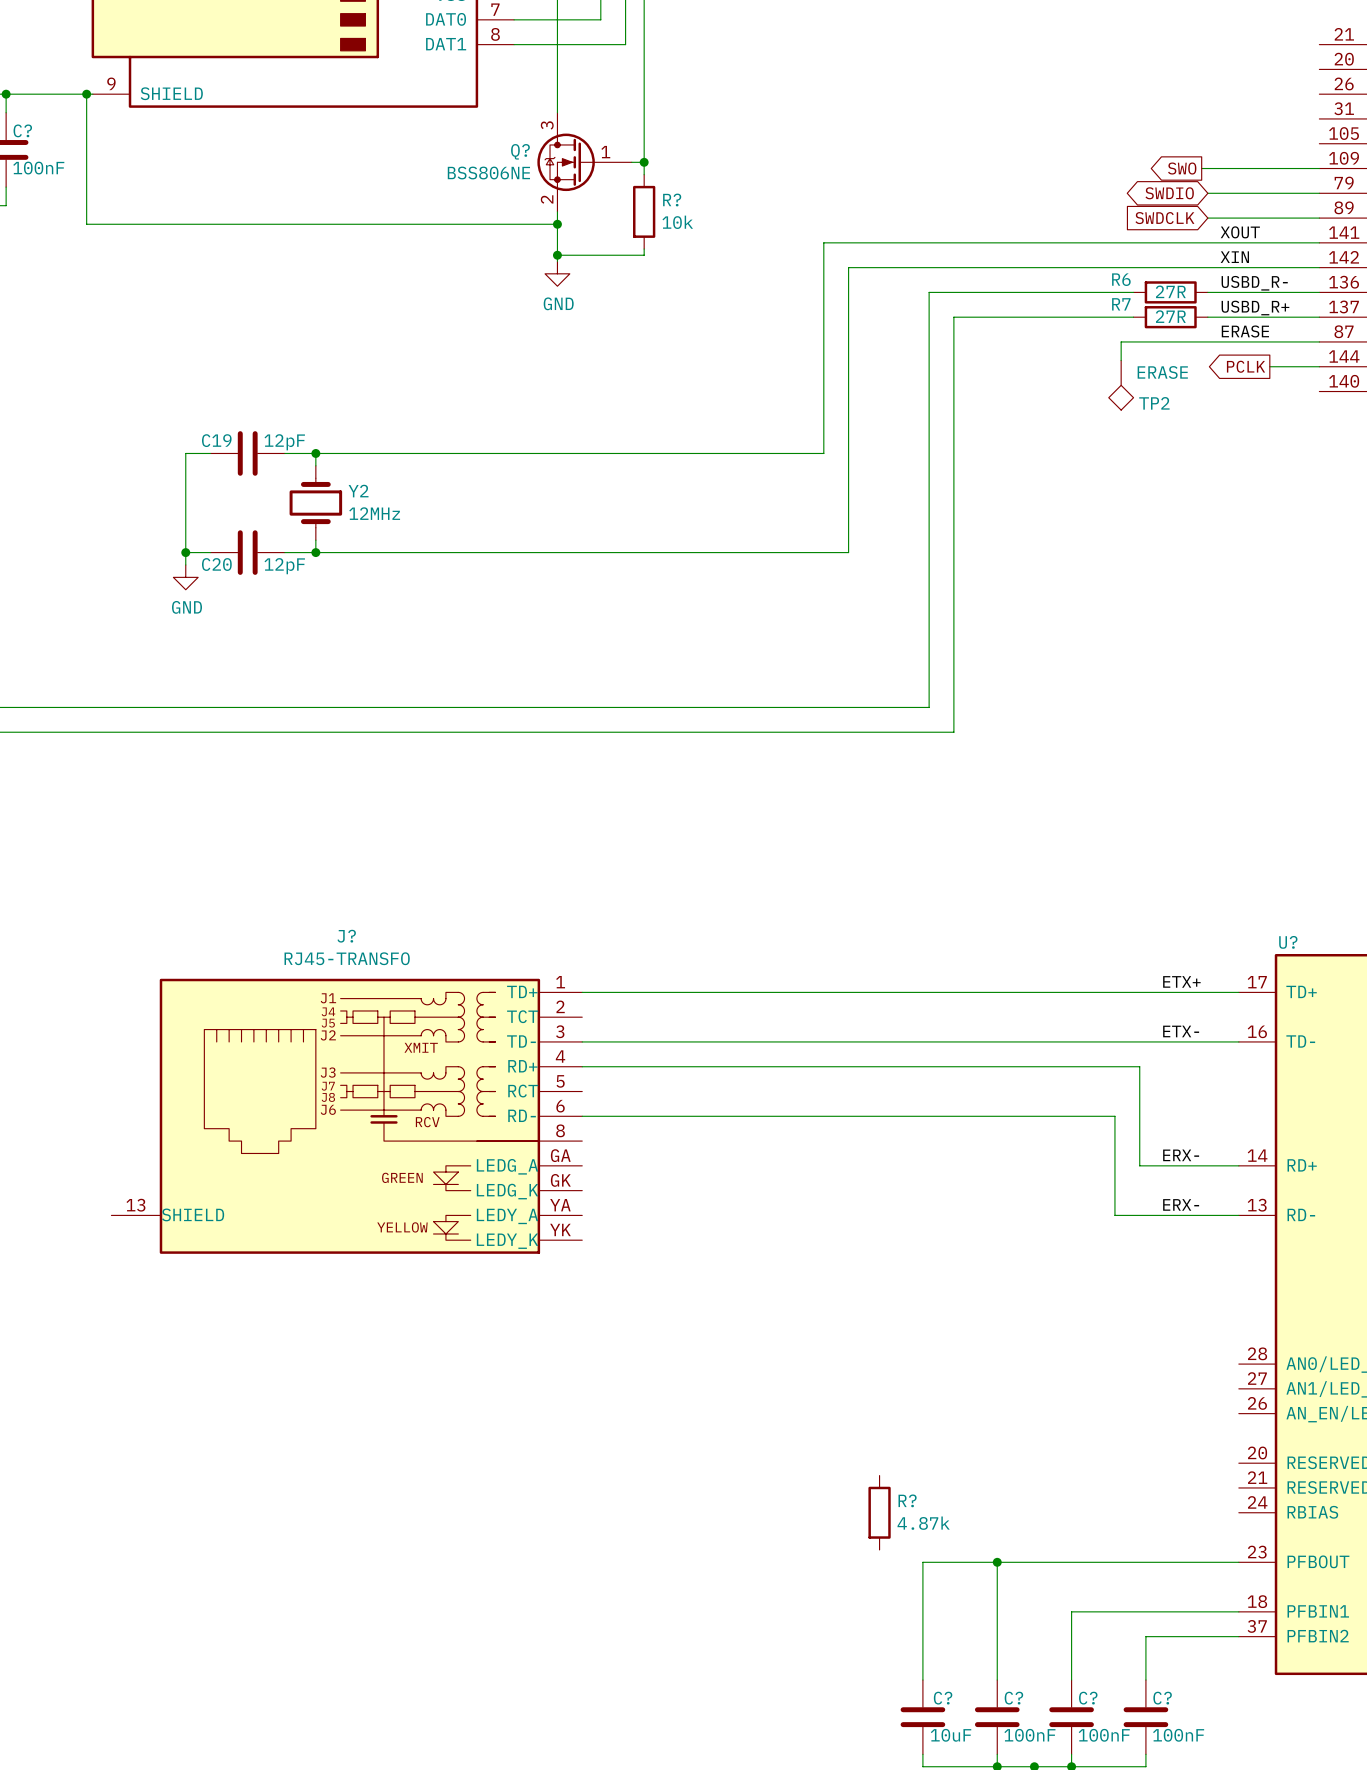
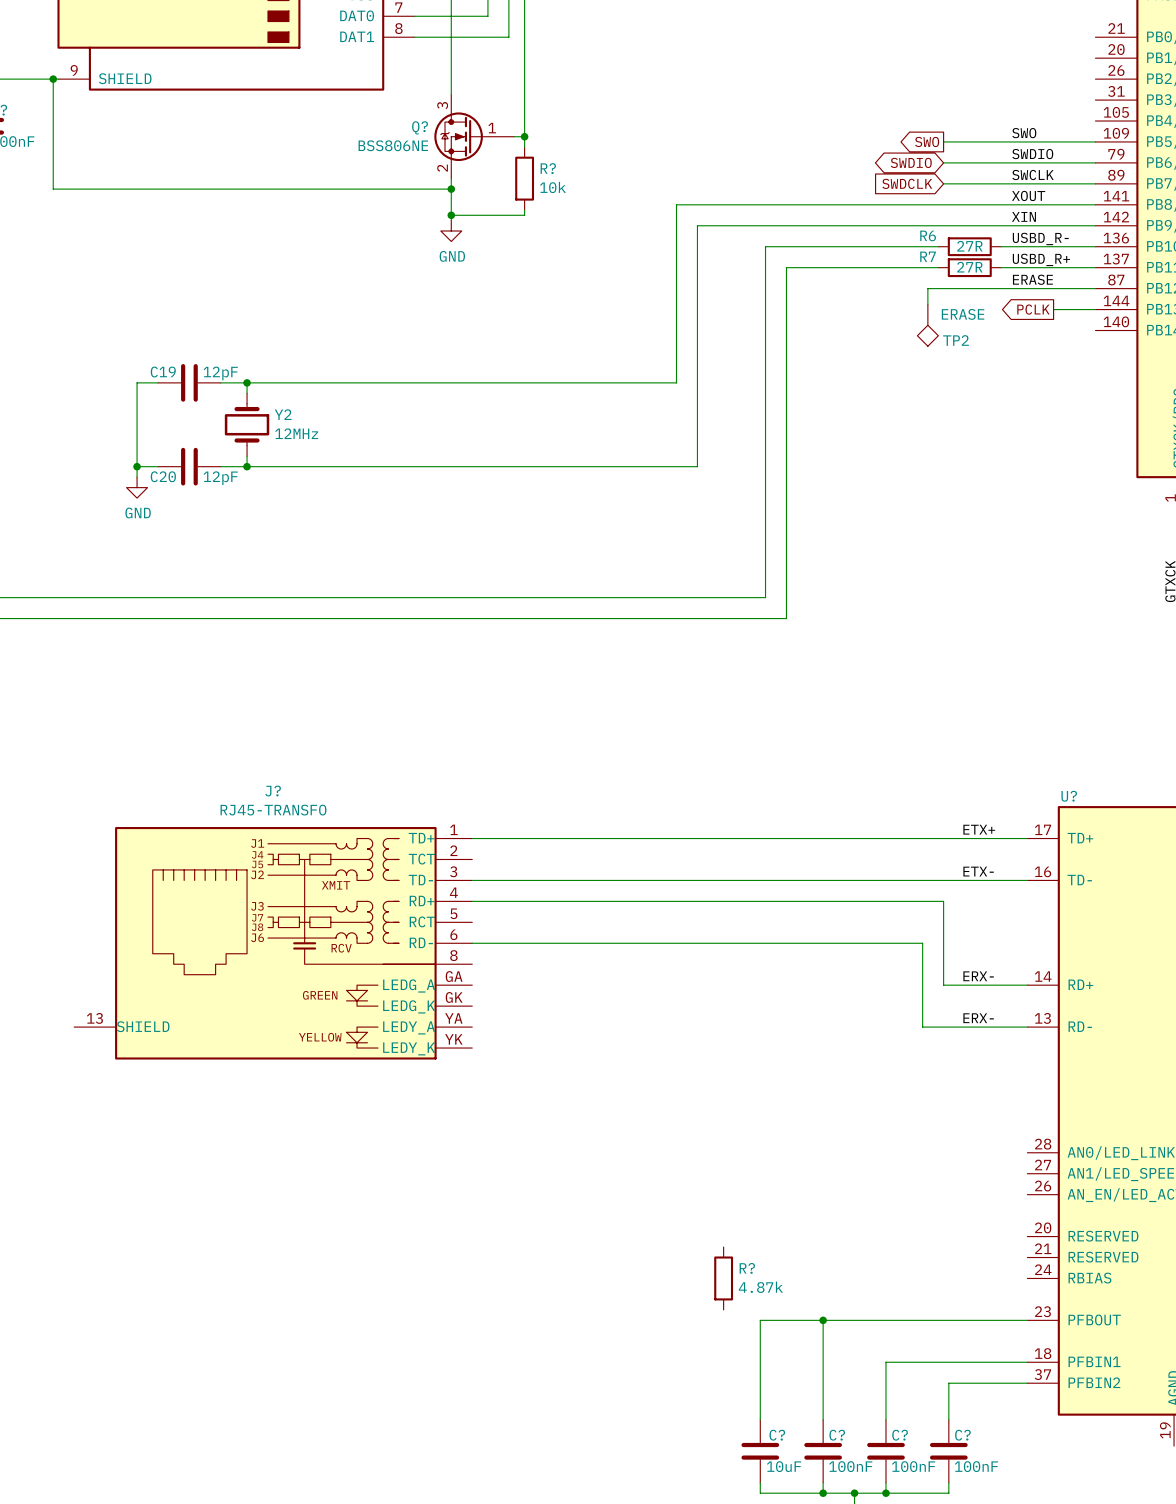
label: none -> SWO (1024, 133)
wire: none -> (943, 141) (995, 141)
global label position: SWO (1182, 168) -> SWO (927, 141)
label: none -> SWDIO (1032, 154)
wire: none -> (943, 162) (1001, 162)
global label position: SWDIO (1169, 193) -> SWDIO (911, 162)
label: none -> SWCLK (1033, 175)
wire: none -> (943, 183) (1001, 183)
global label position: SWDCLK (1164, 218) -> SWDCLK (907, 183)

